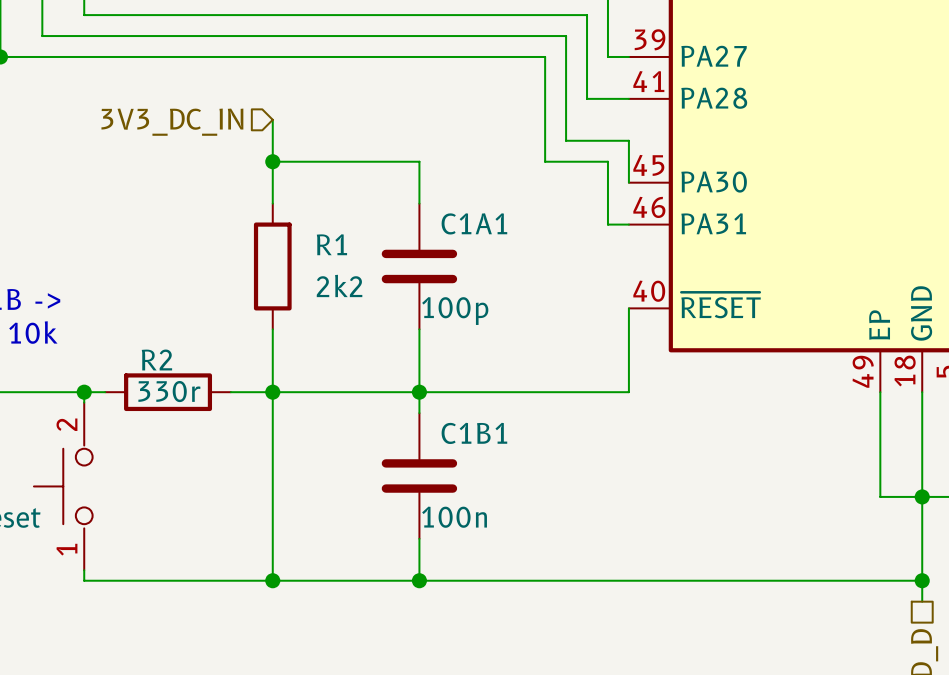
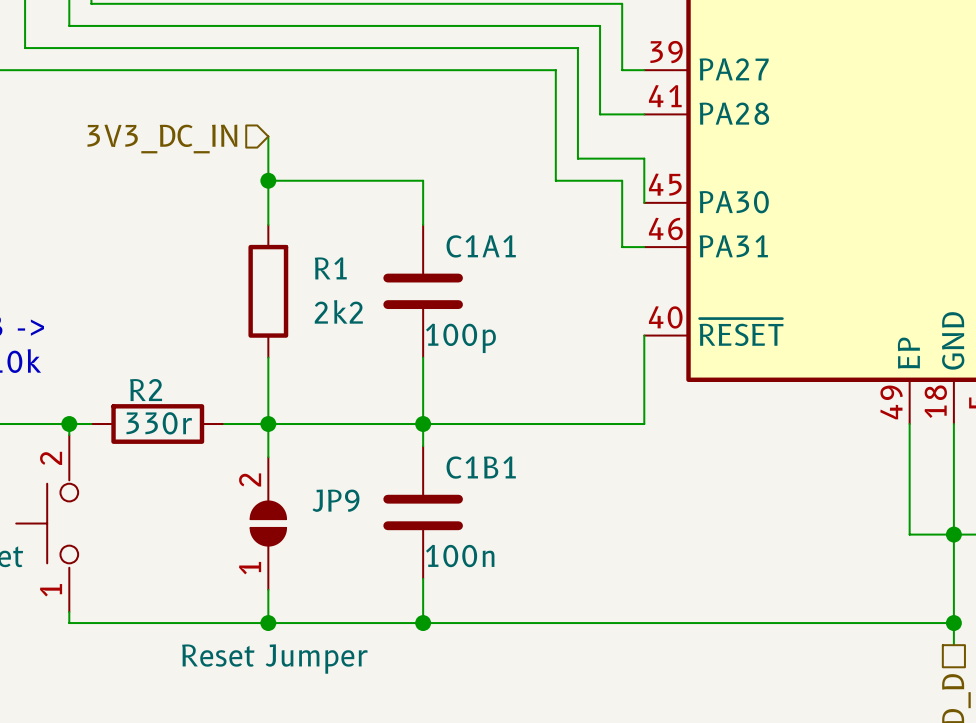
JP9: none -> Reset Jumper (268, 523)

